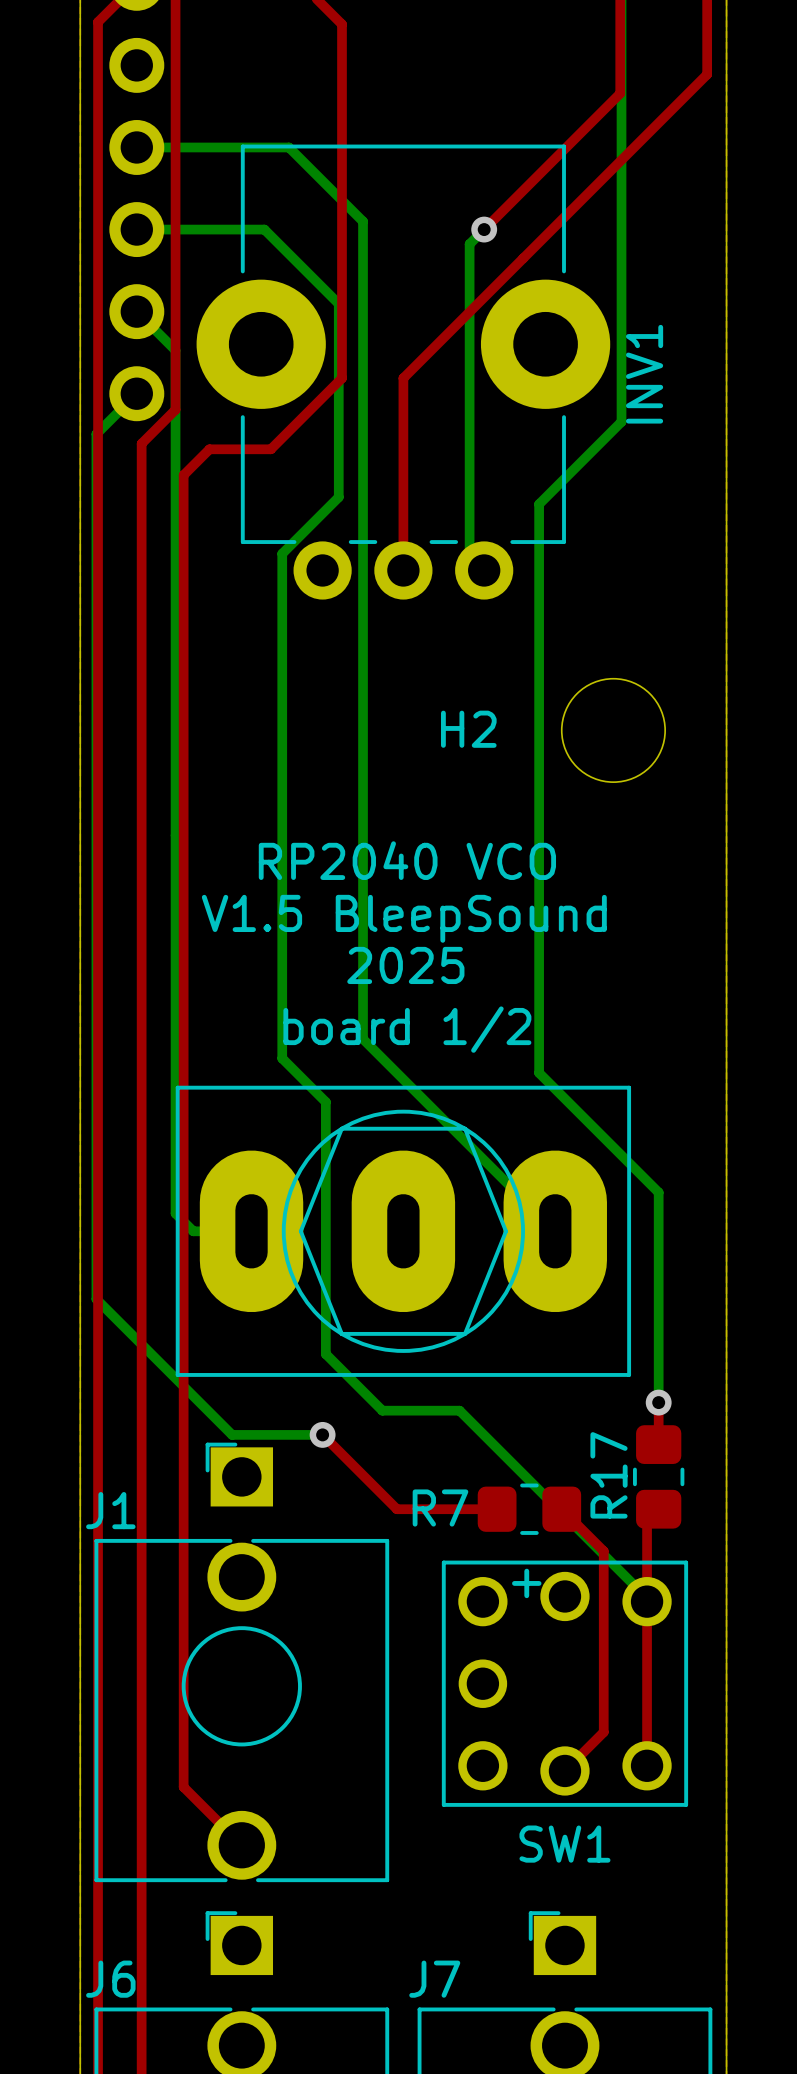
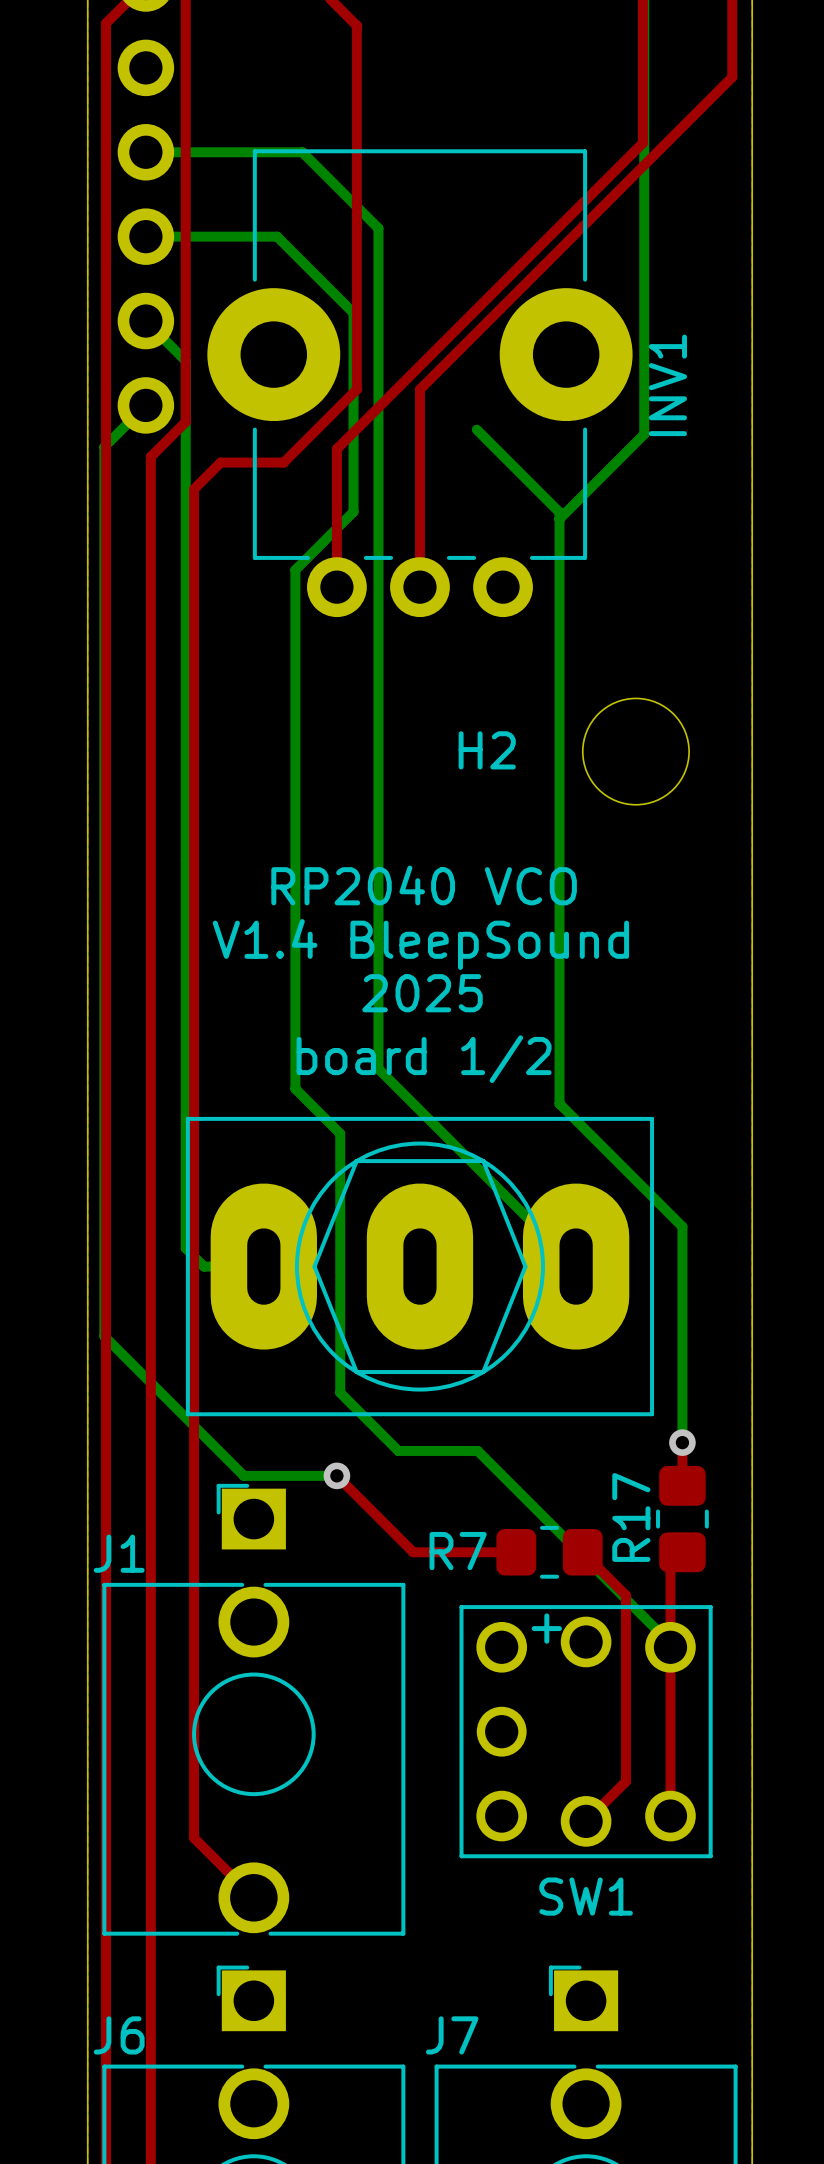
top track: (620, 93) (484, 229) -> (642, 96) (642, 143) (336, 449) (336, 587)
bottom track: (484, 229) (469, 244) (469, 555) (484, 570) -> none
via: (484, 229) -> none
bottom track: none -> (476, 429) (559, 512) (559, 519)
text: V1.5 BleepSound (404, 918) -> V1.4 BleepSound (420, 944)

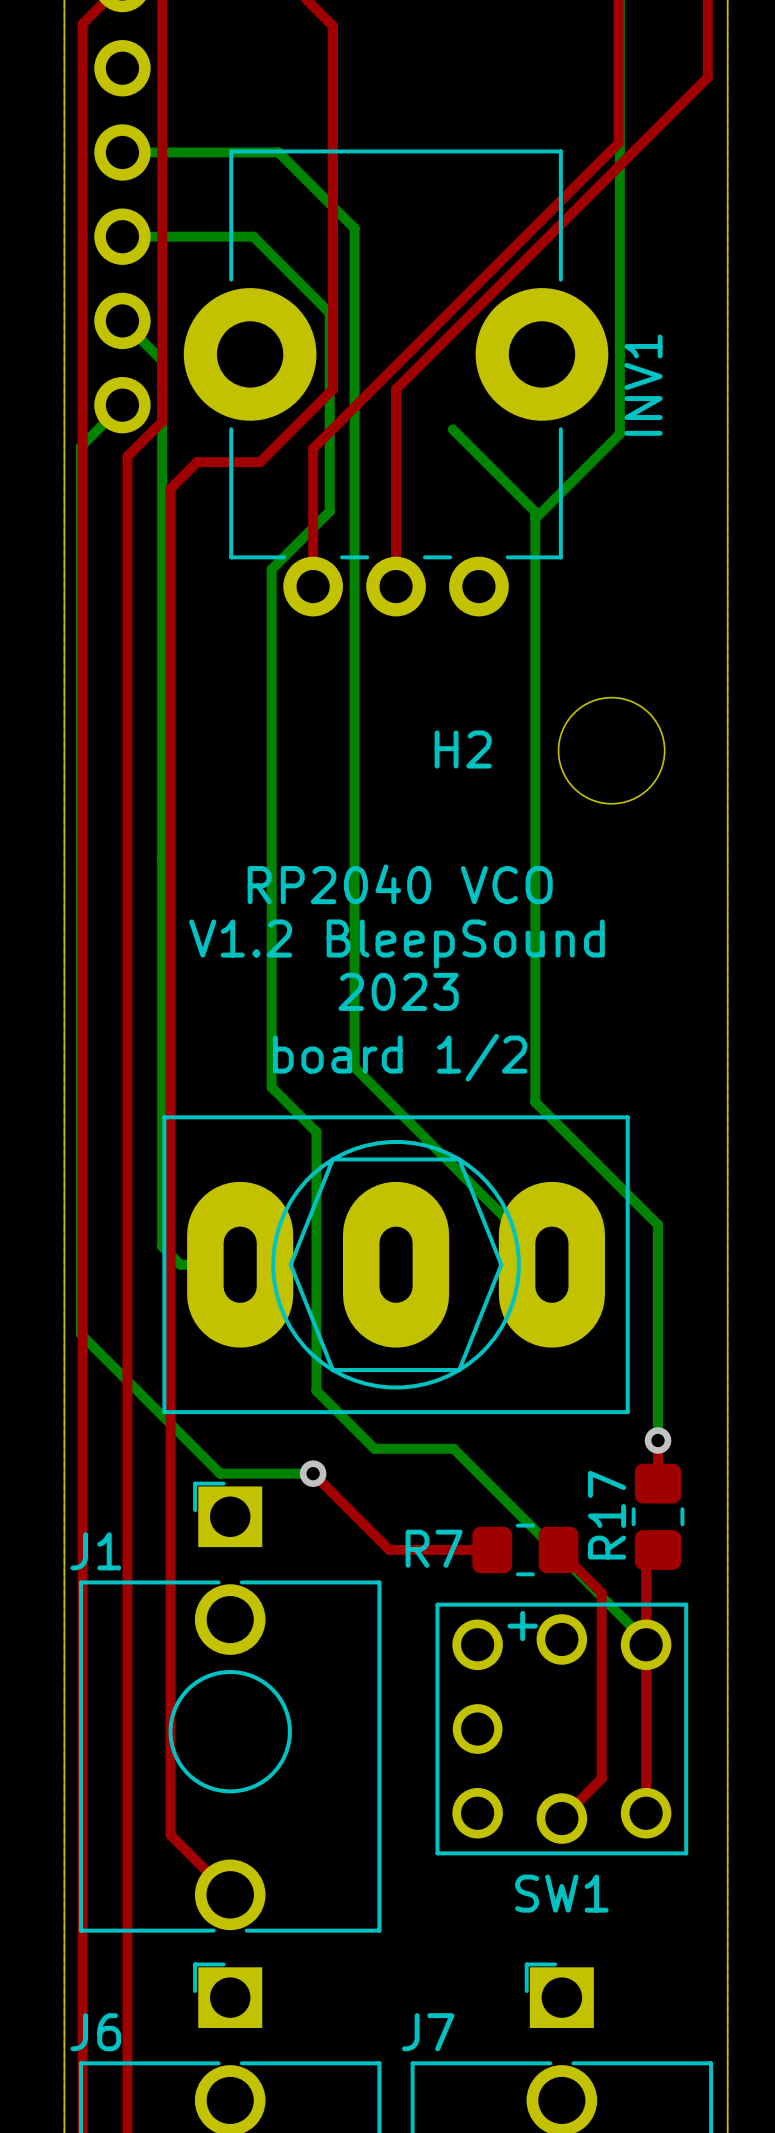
text: V1.4 BleepSound (420, 944) -> V1.2 BleepSound (396, 944)
text: 2025 (422, 993) -> 2023 (398, 991)

